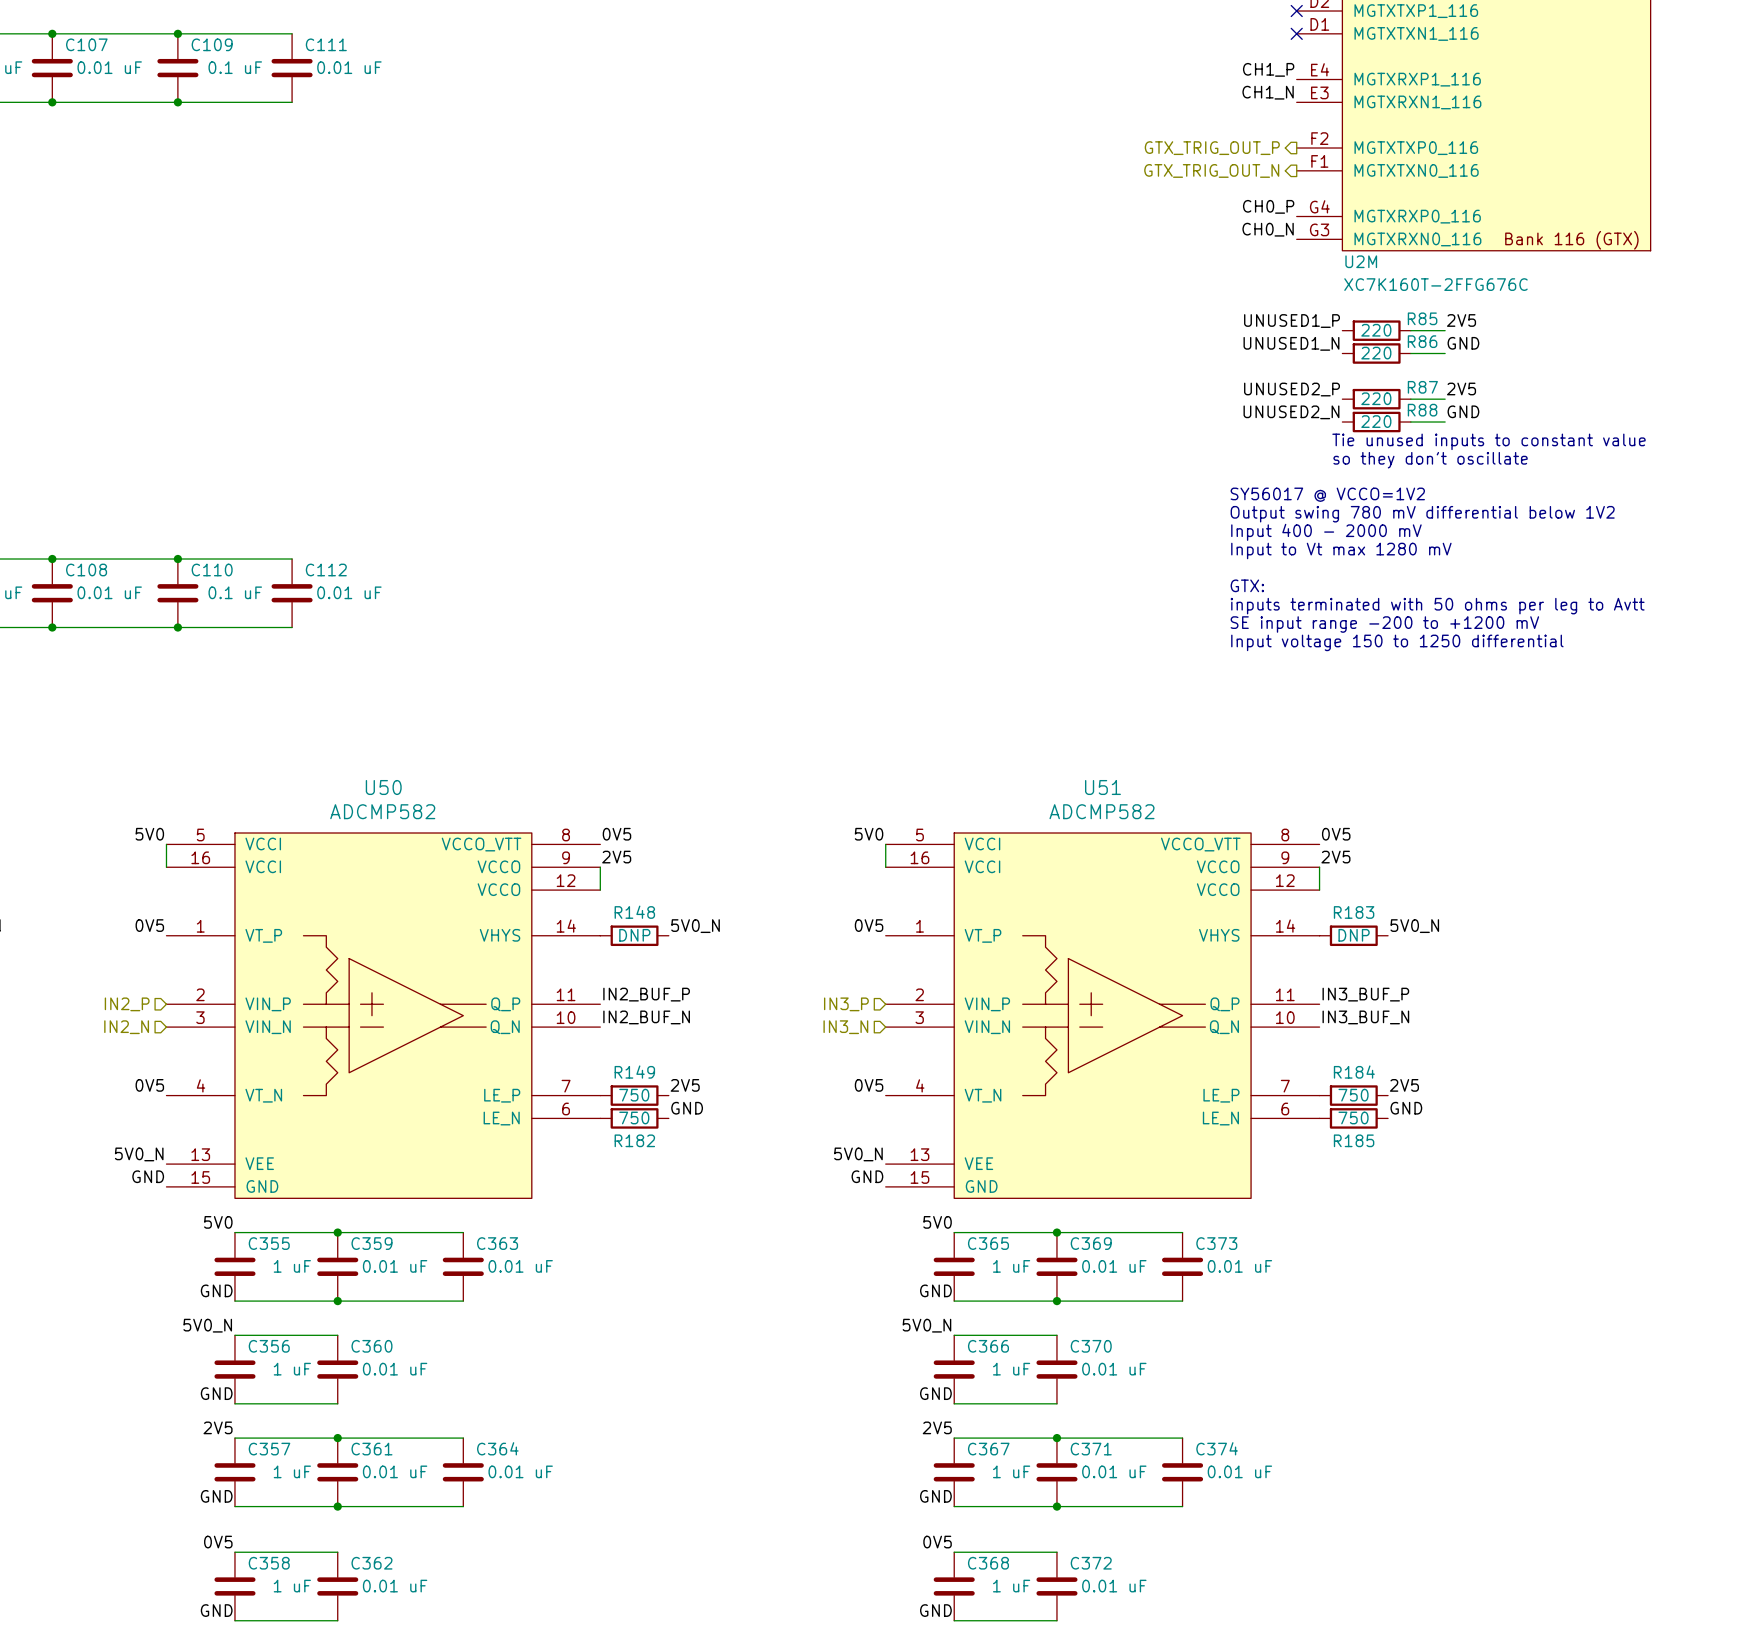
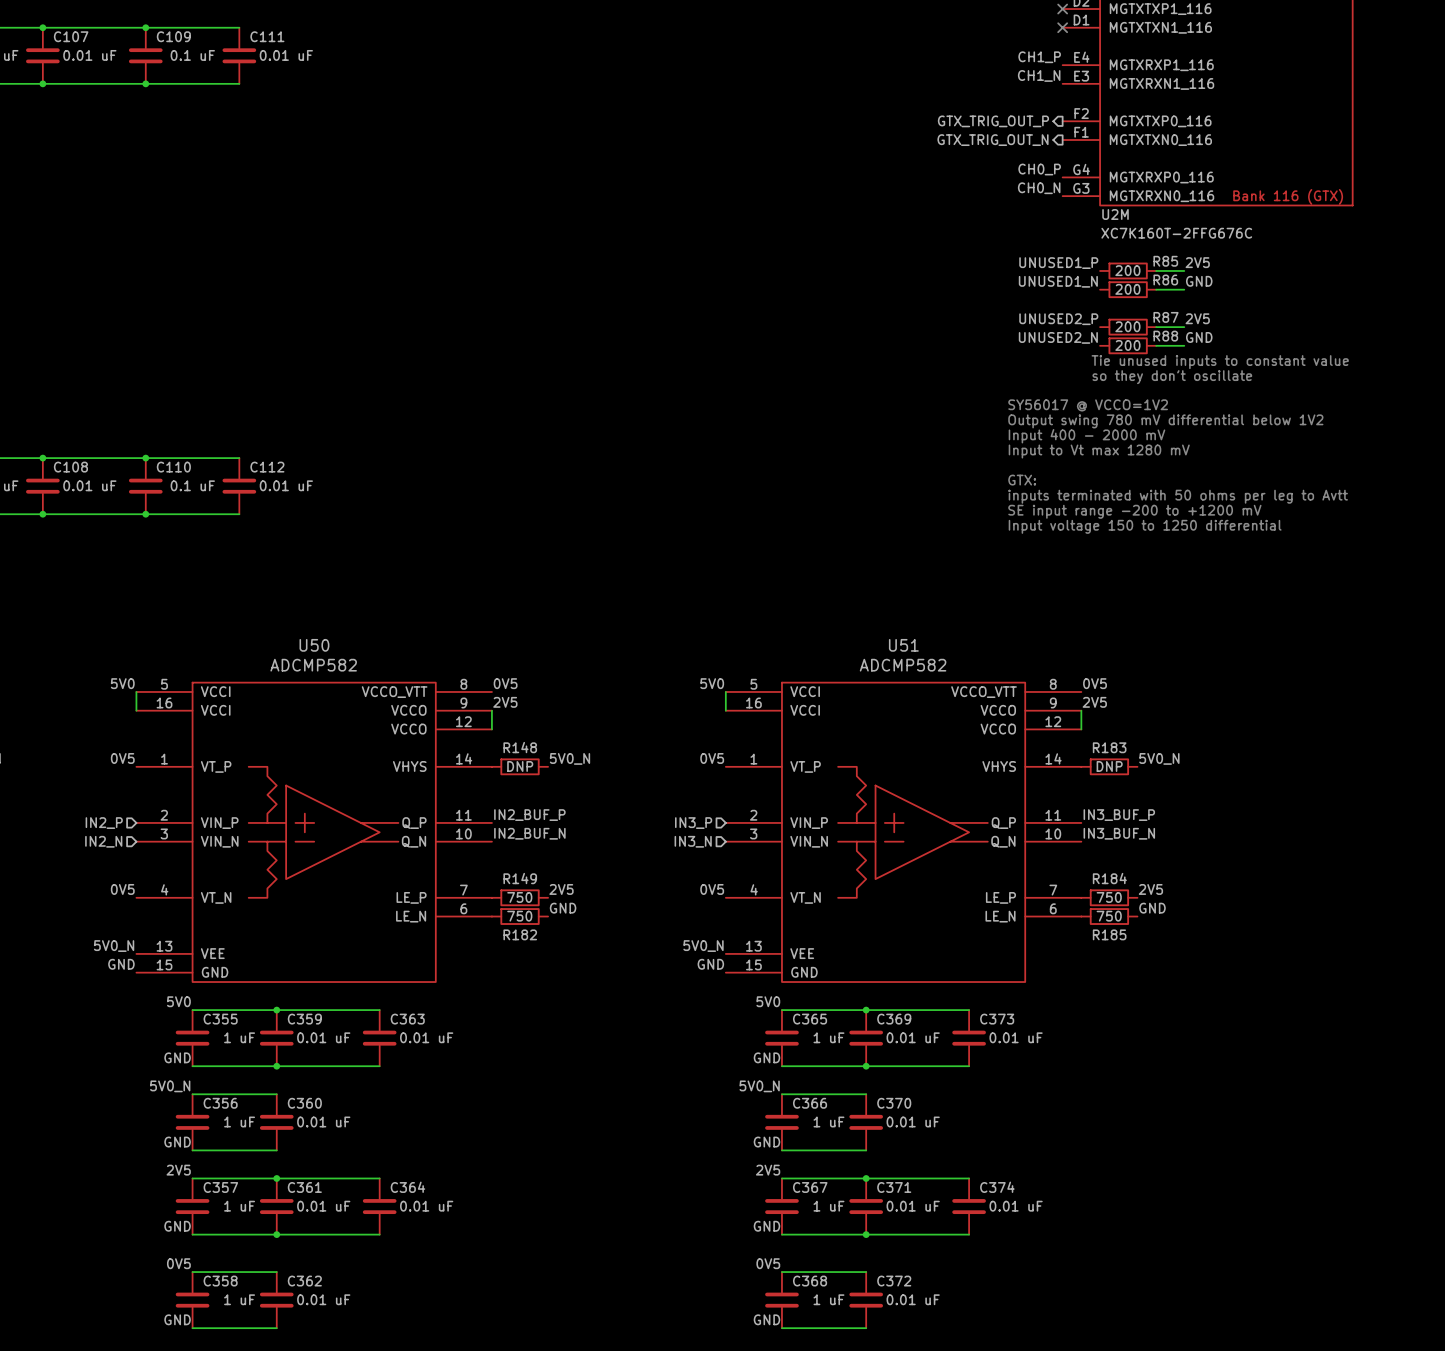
R85 value: 220 (1376, 330) -> 200 (1127, 270)
R86 value: 220 (1376, 353) -> 200 (1127, 289)
R87 value: 220 (1376, 398) -> 200 (1127, 326)
R88 value: 220 (1376, 421) -> 200 (1127, 345)

